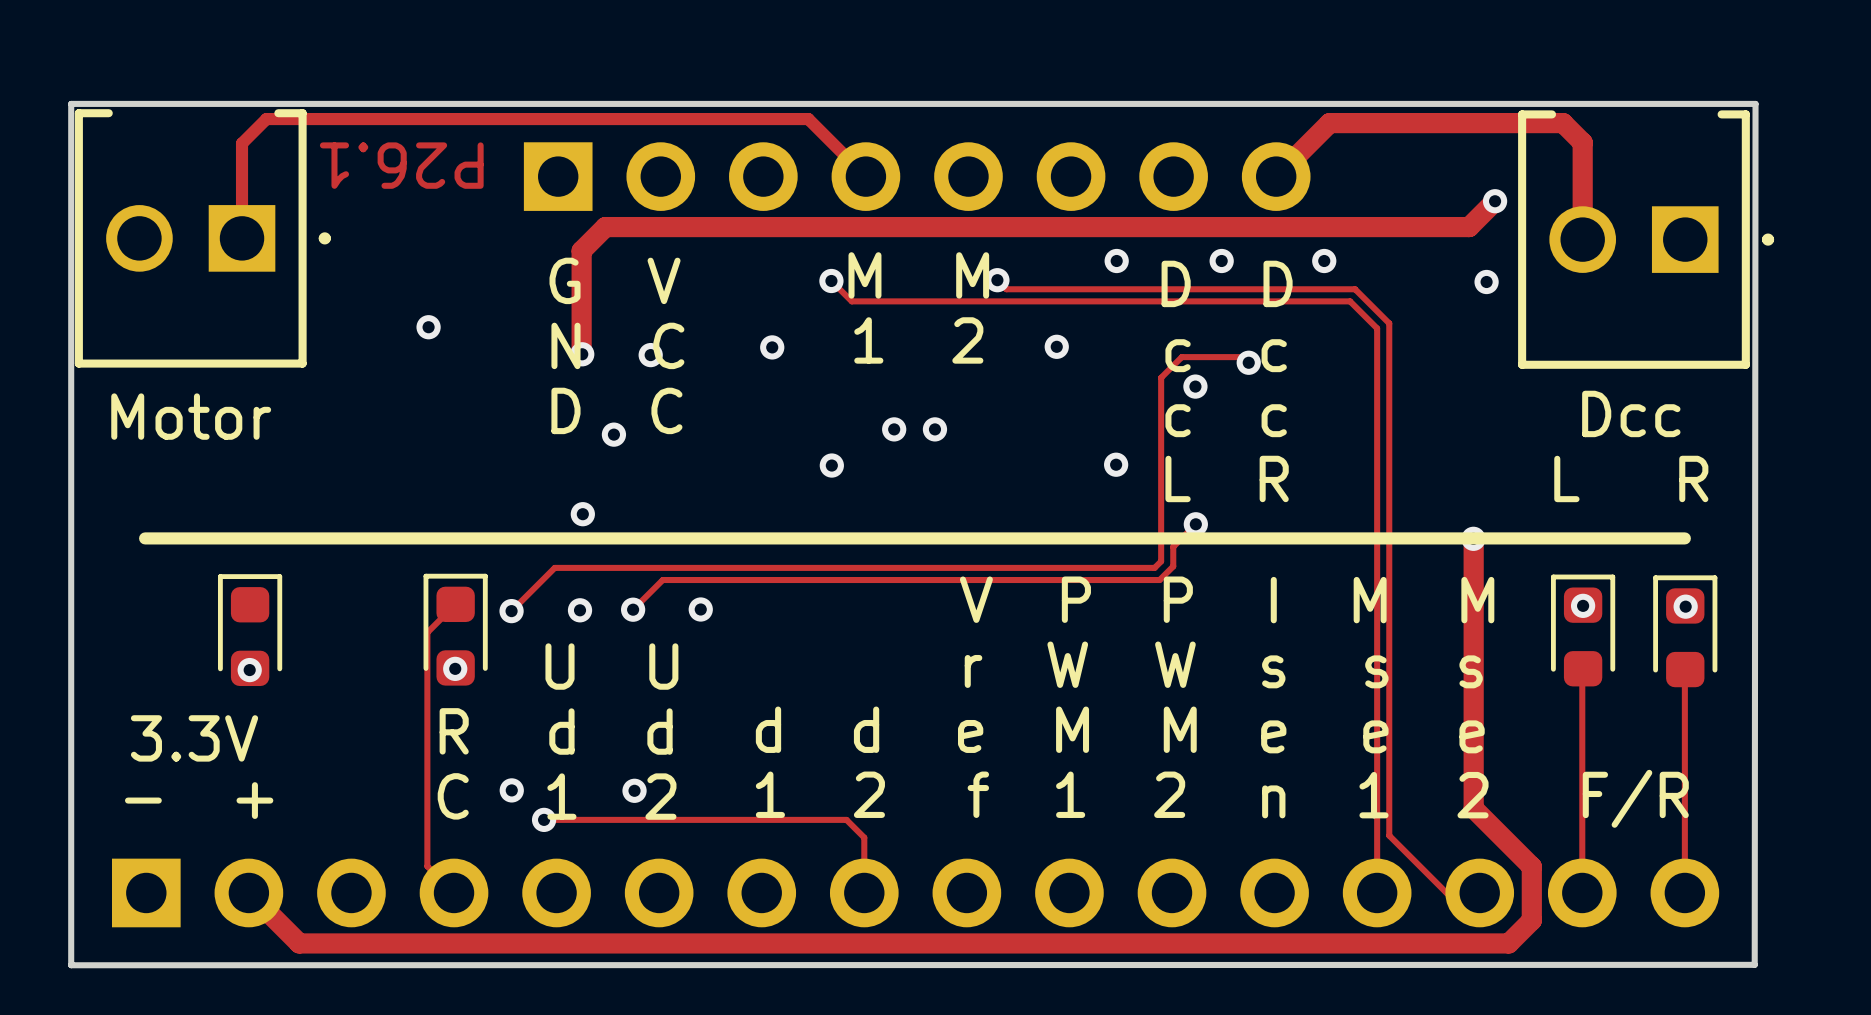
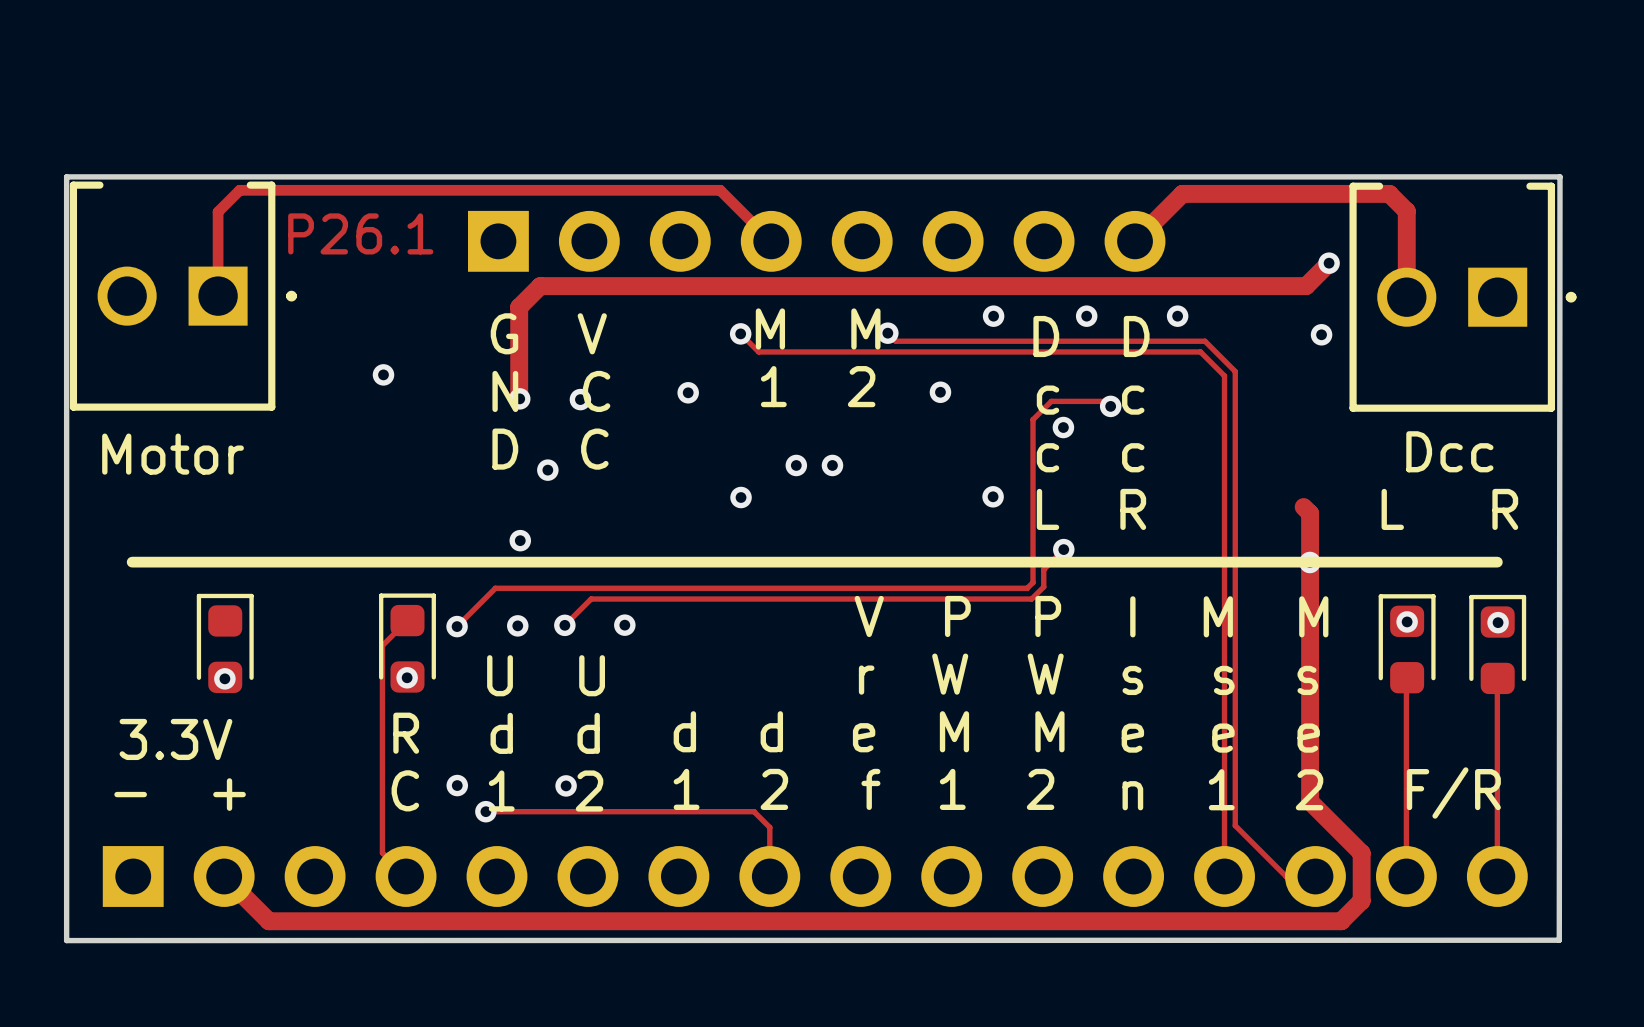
text rotation: 0° (401, 165) -> 180° (360, 233)
track: none -> (1303, 507) (1310, 513) (1310, 562)

